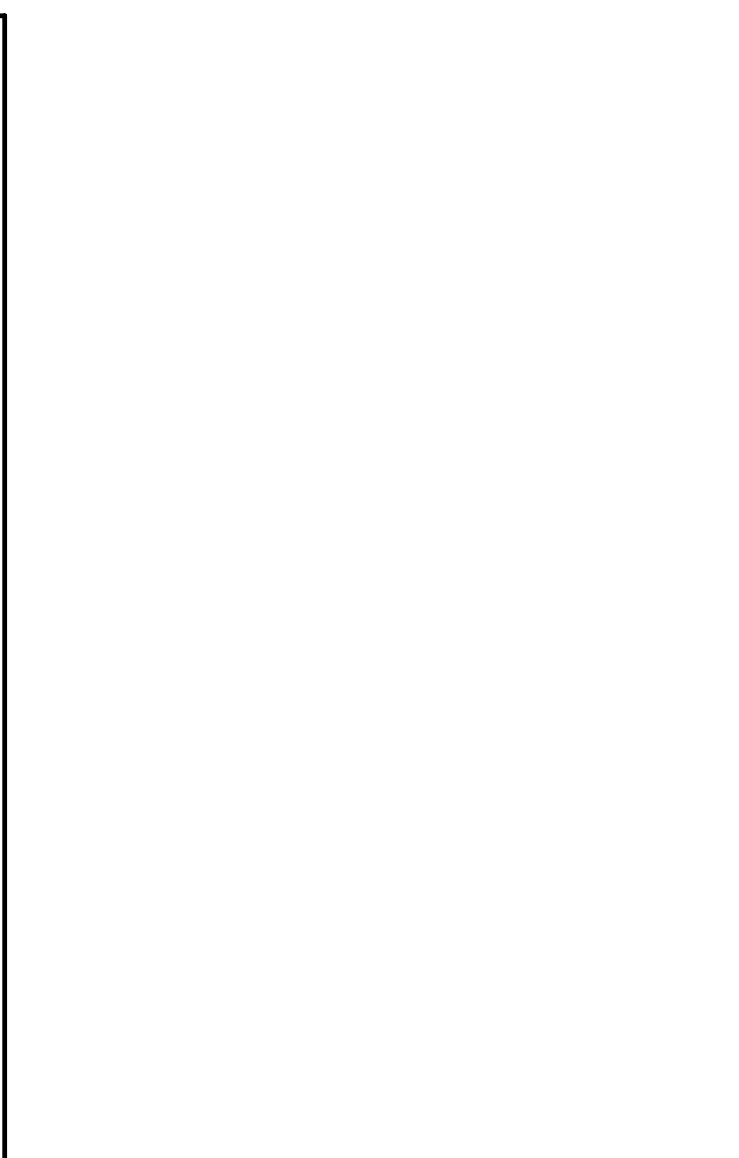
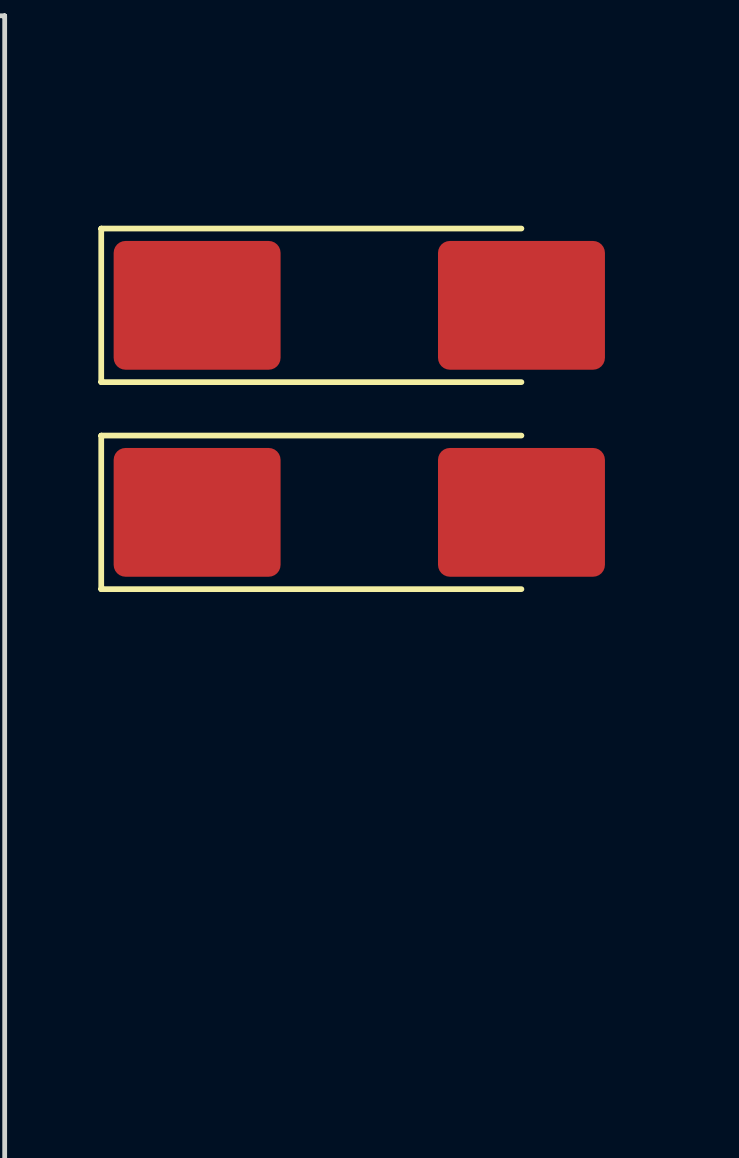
part: none -> (351, 305)
part: none -> (351, 512)

